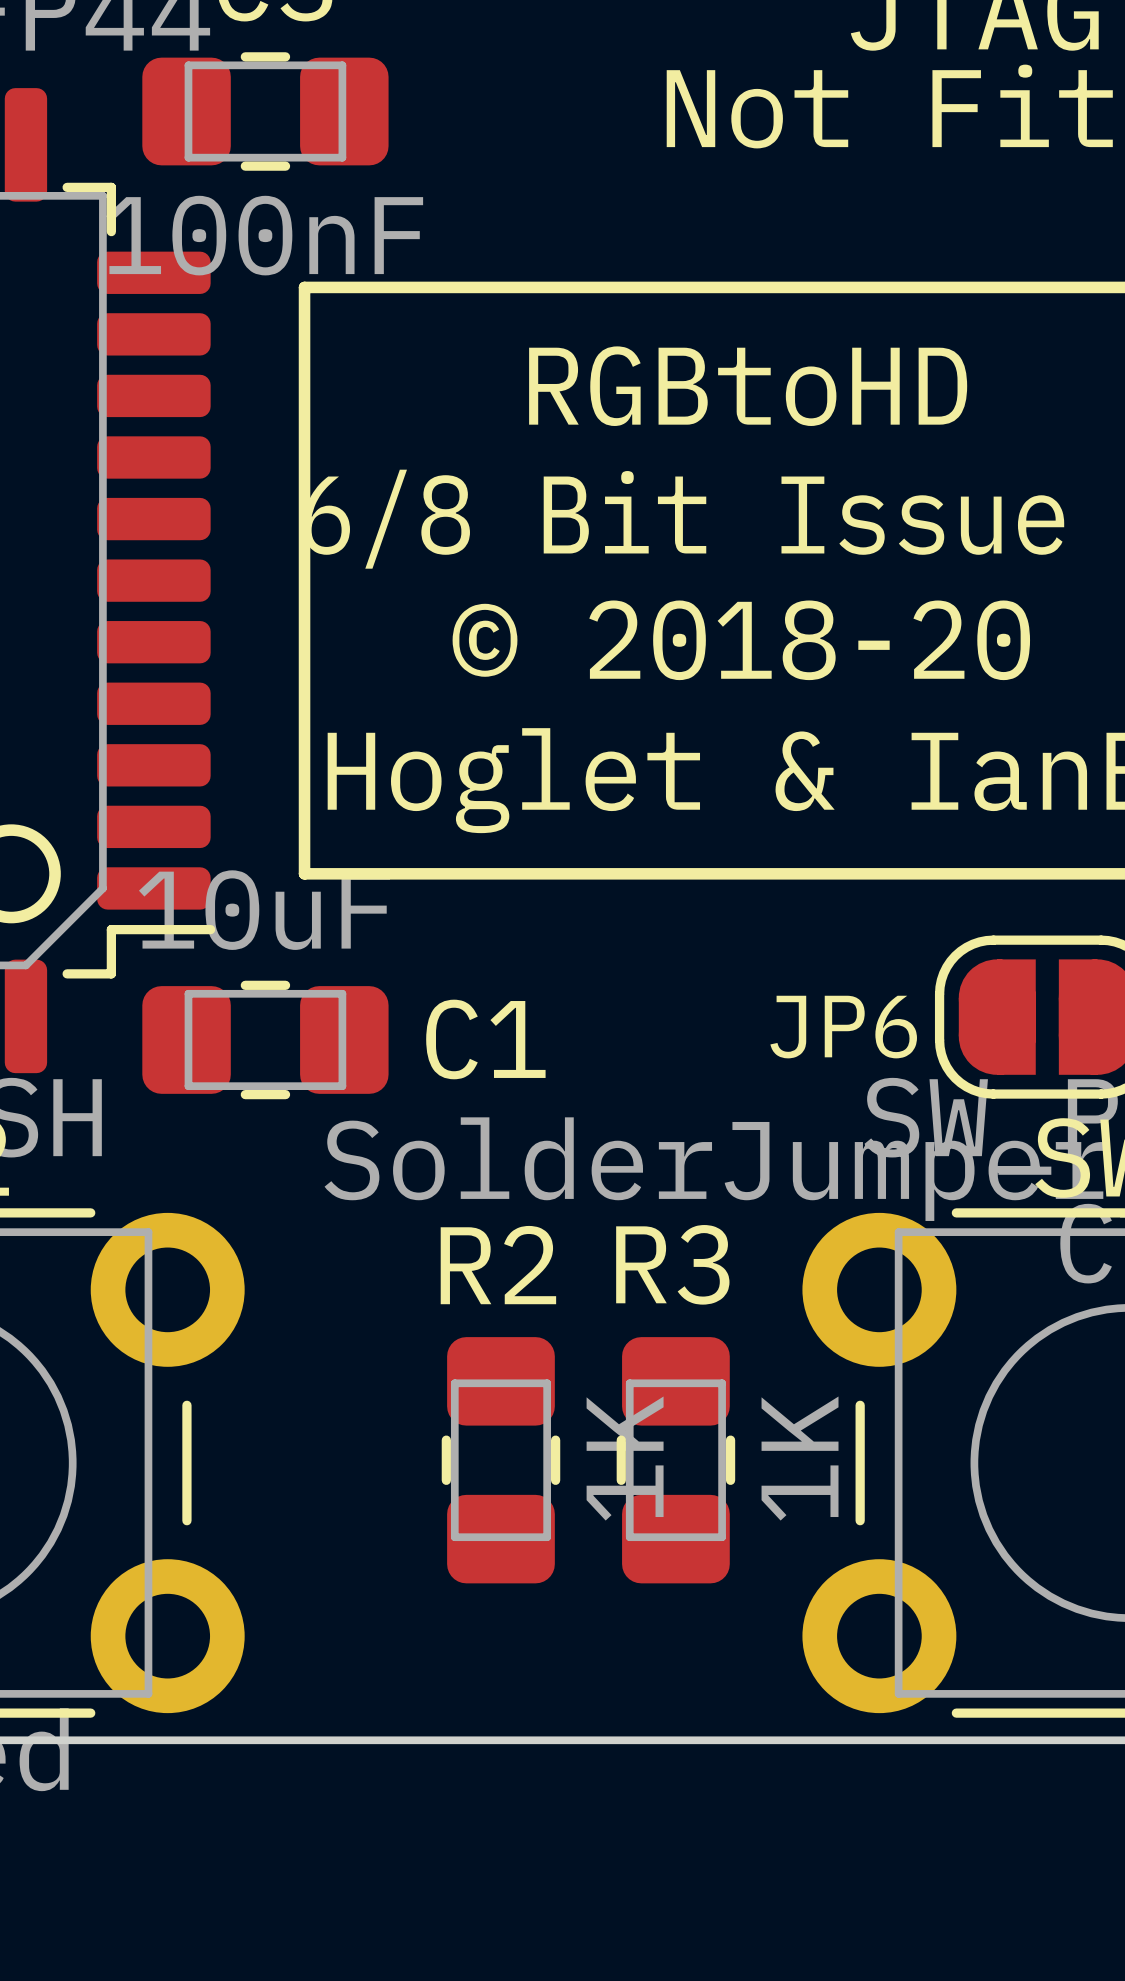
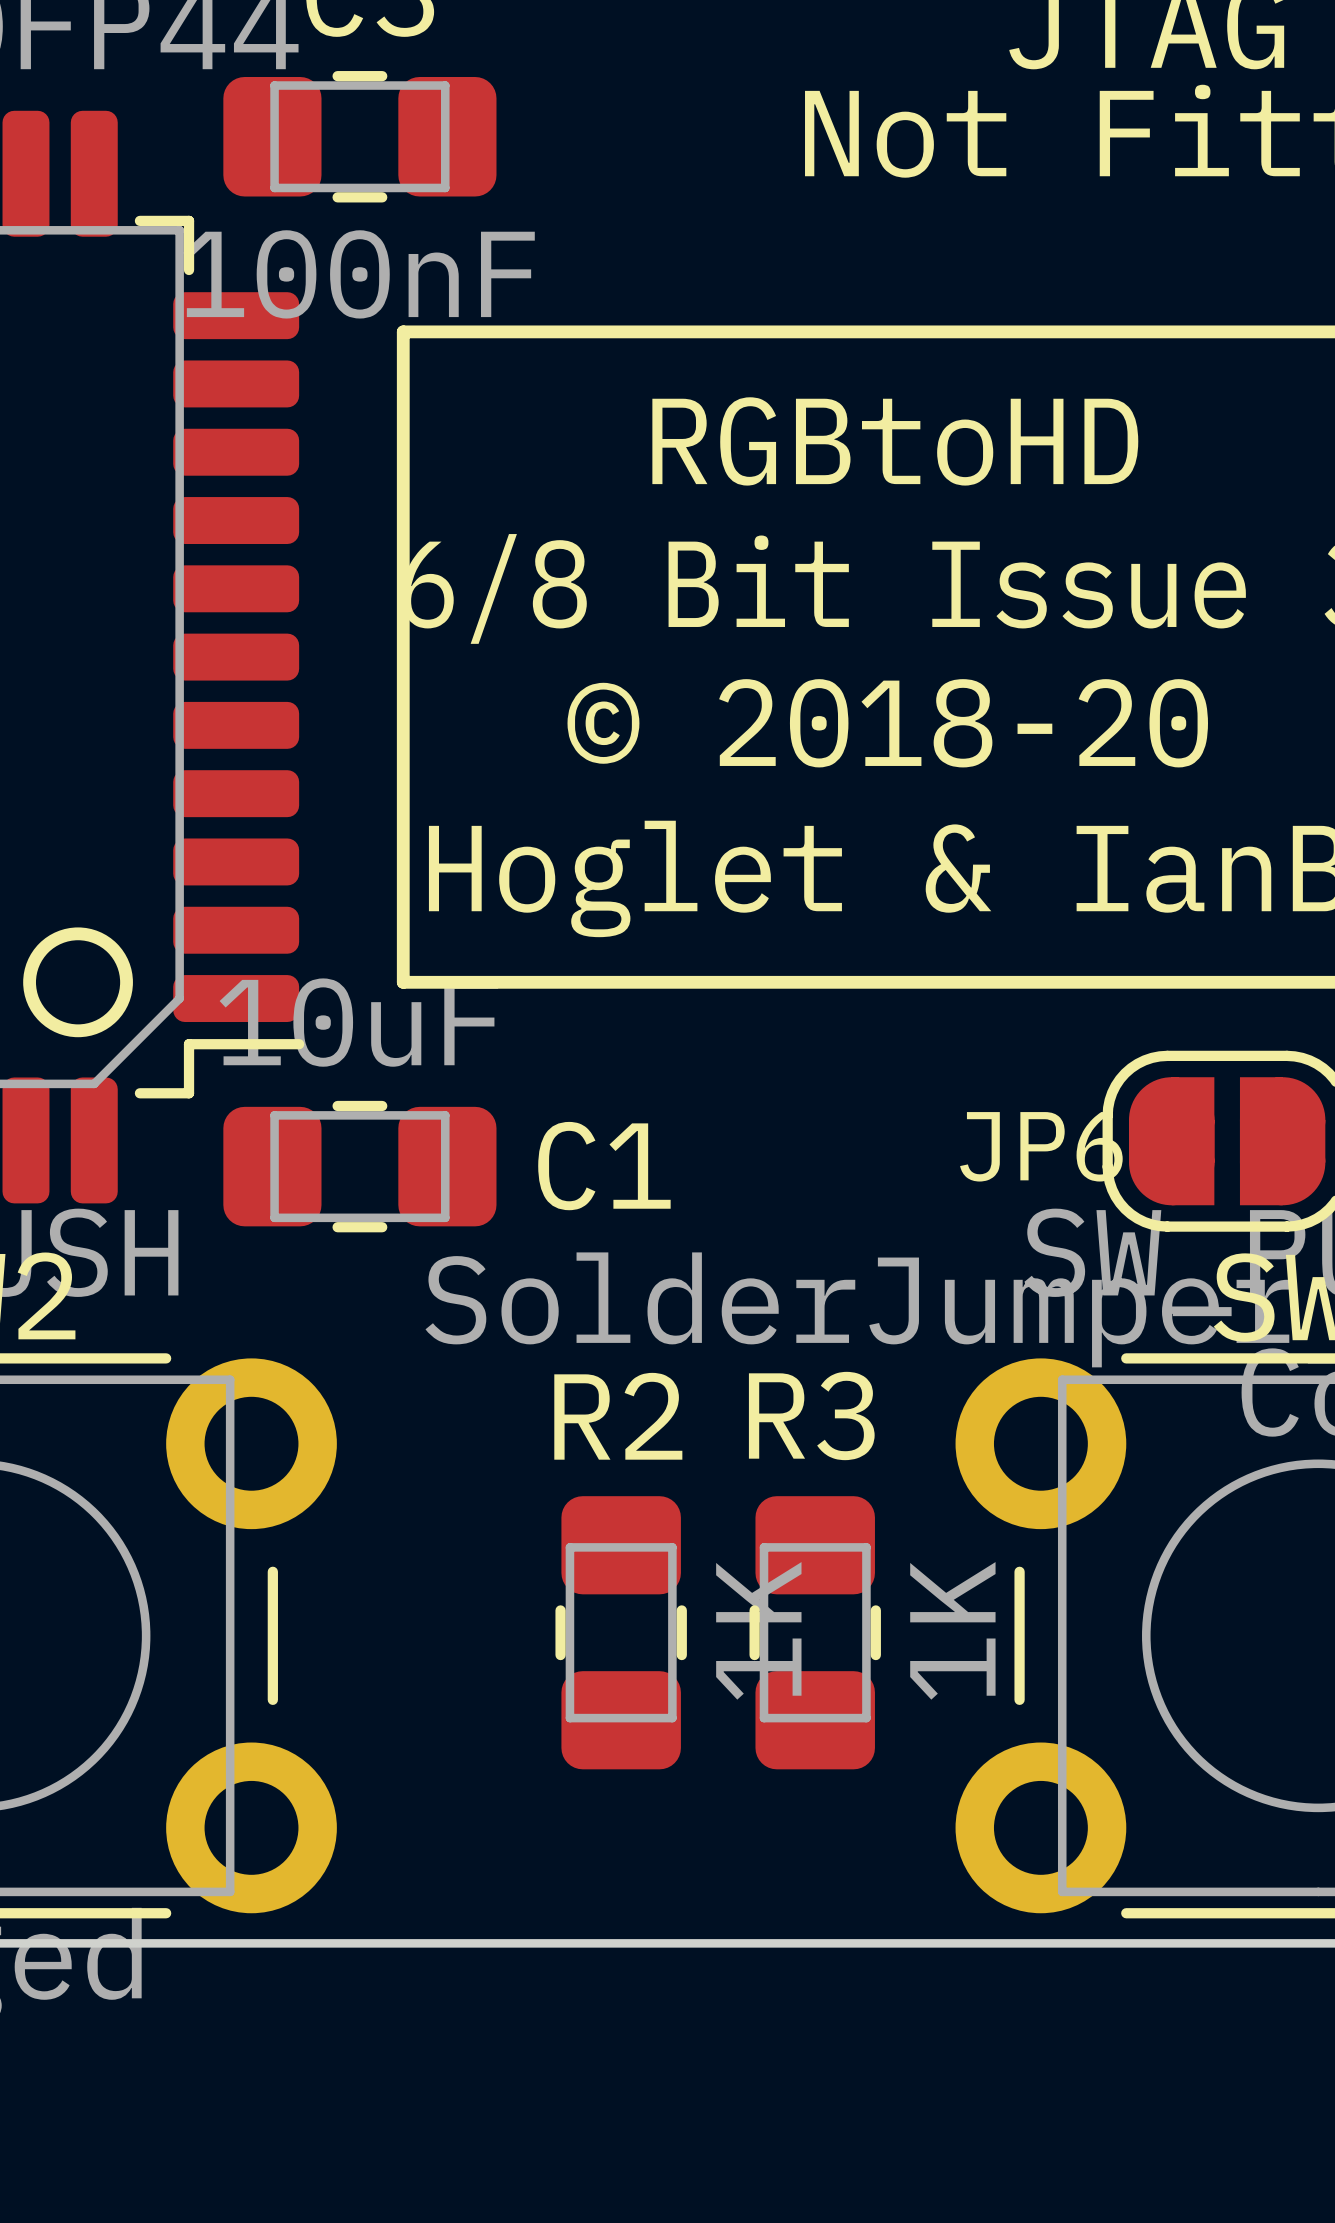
JP6 name position: JP6 (843, 1027) -> JP6 (1041, 1146)

